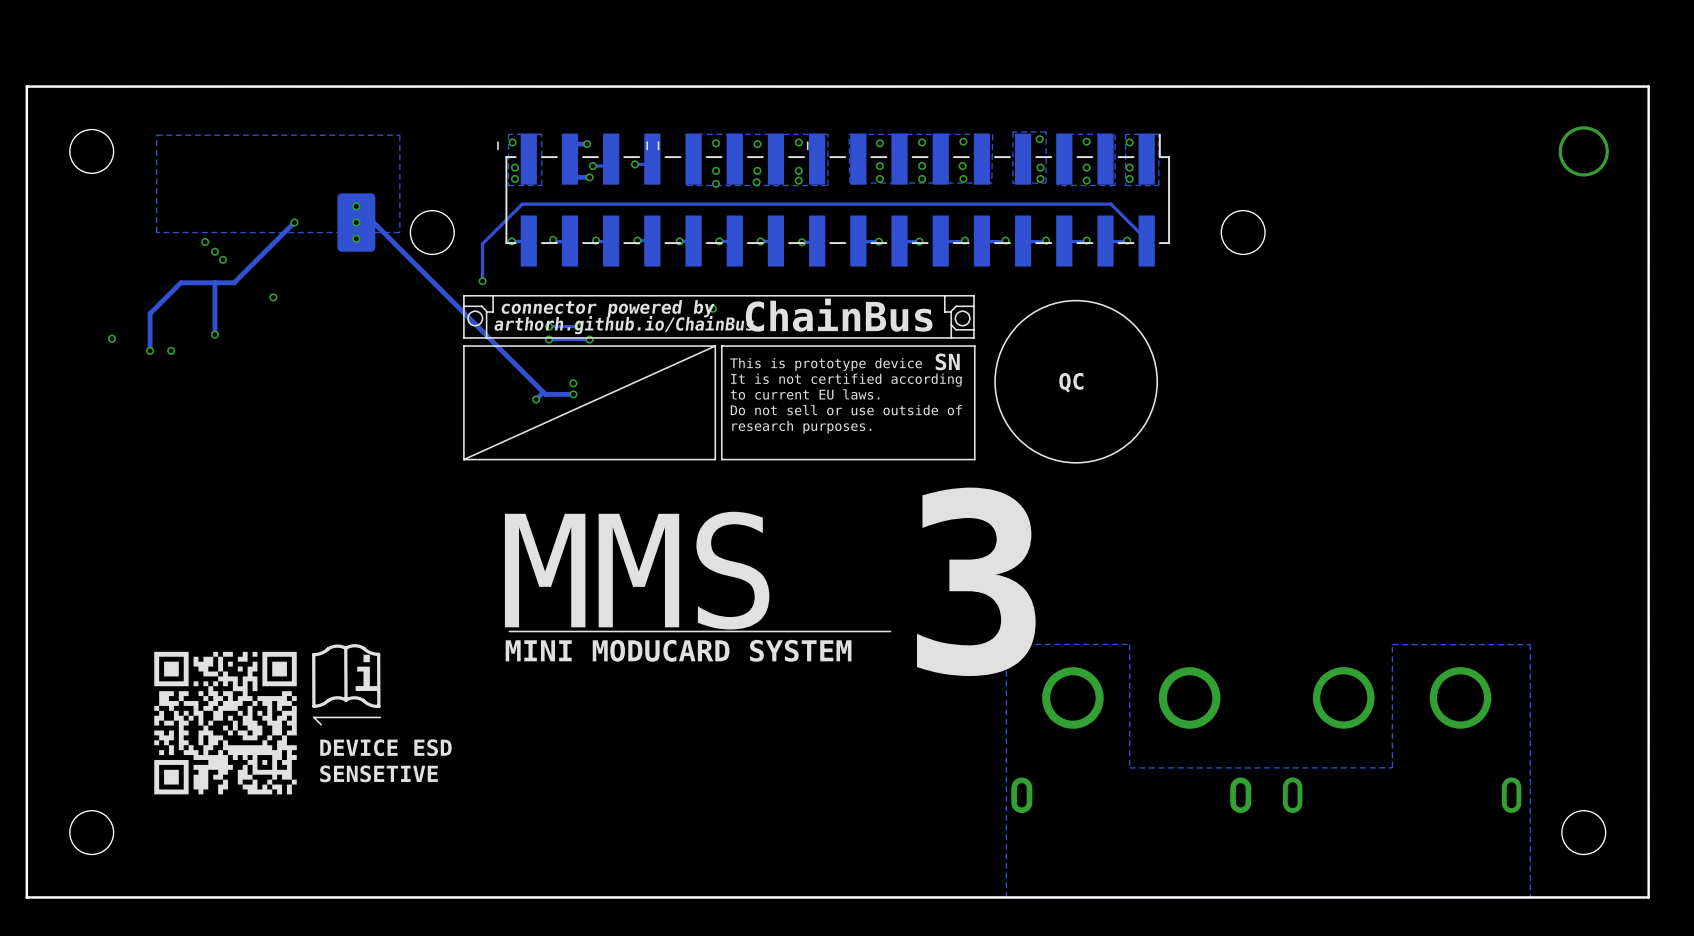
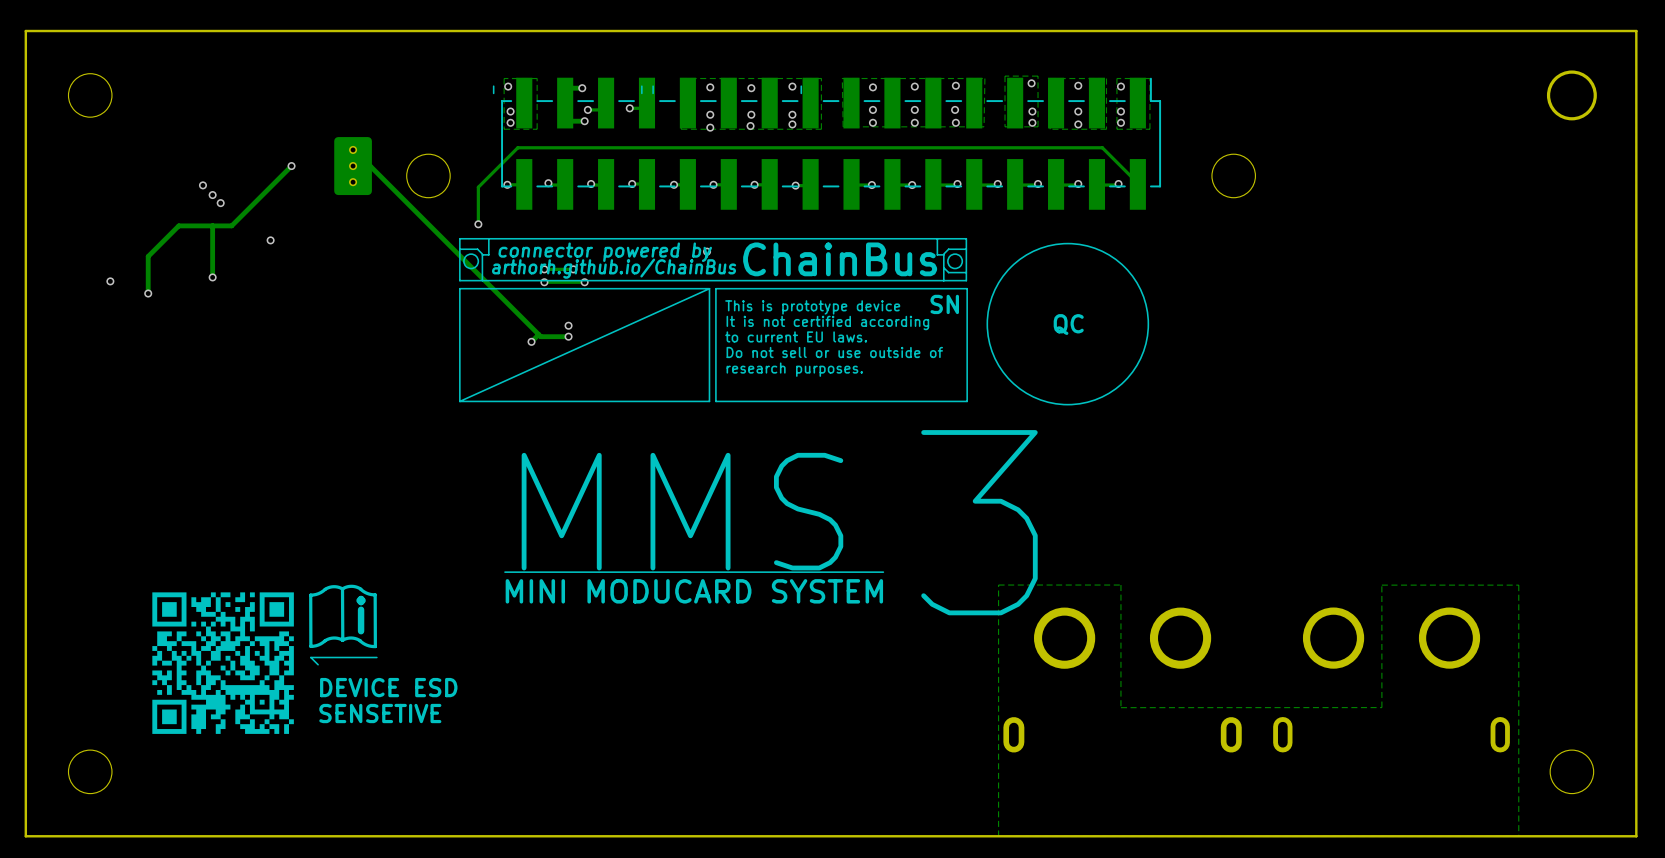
zone outline: (399, 135) (399, 232) (156, 232) (156, 135) (399, 135) -> none
via: (171, 350) -> none

